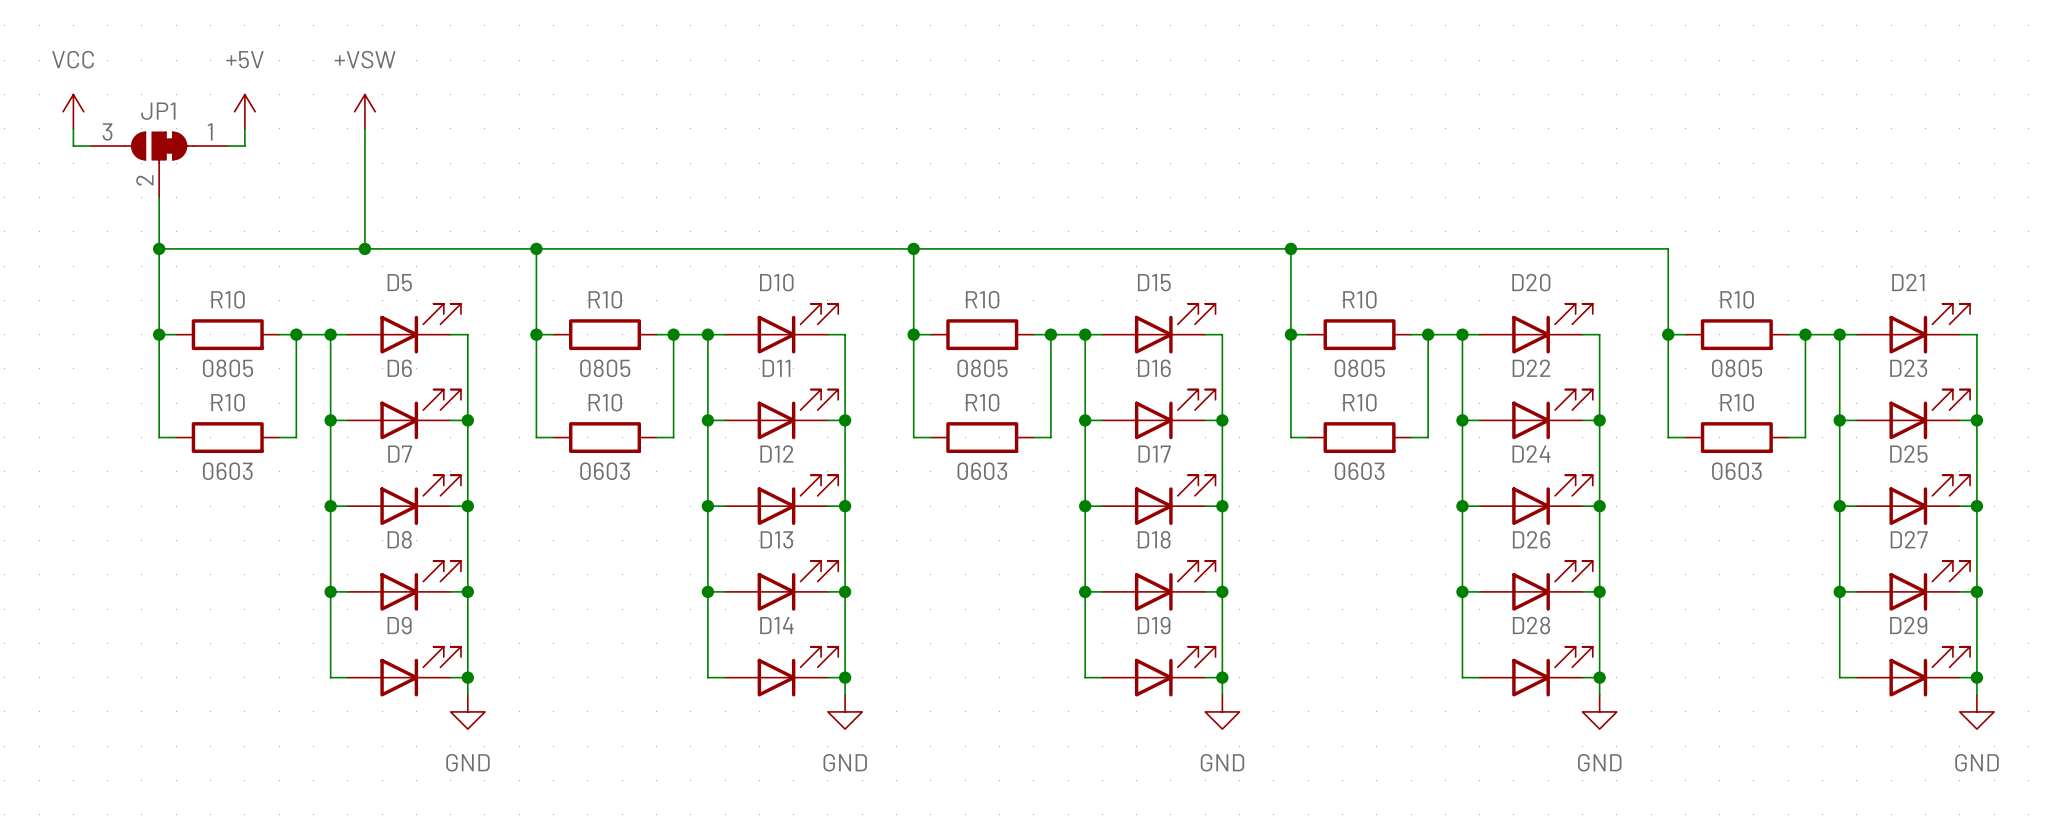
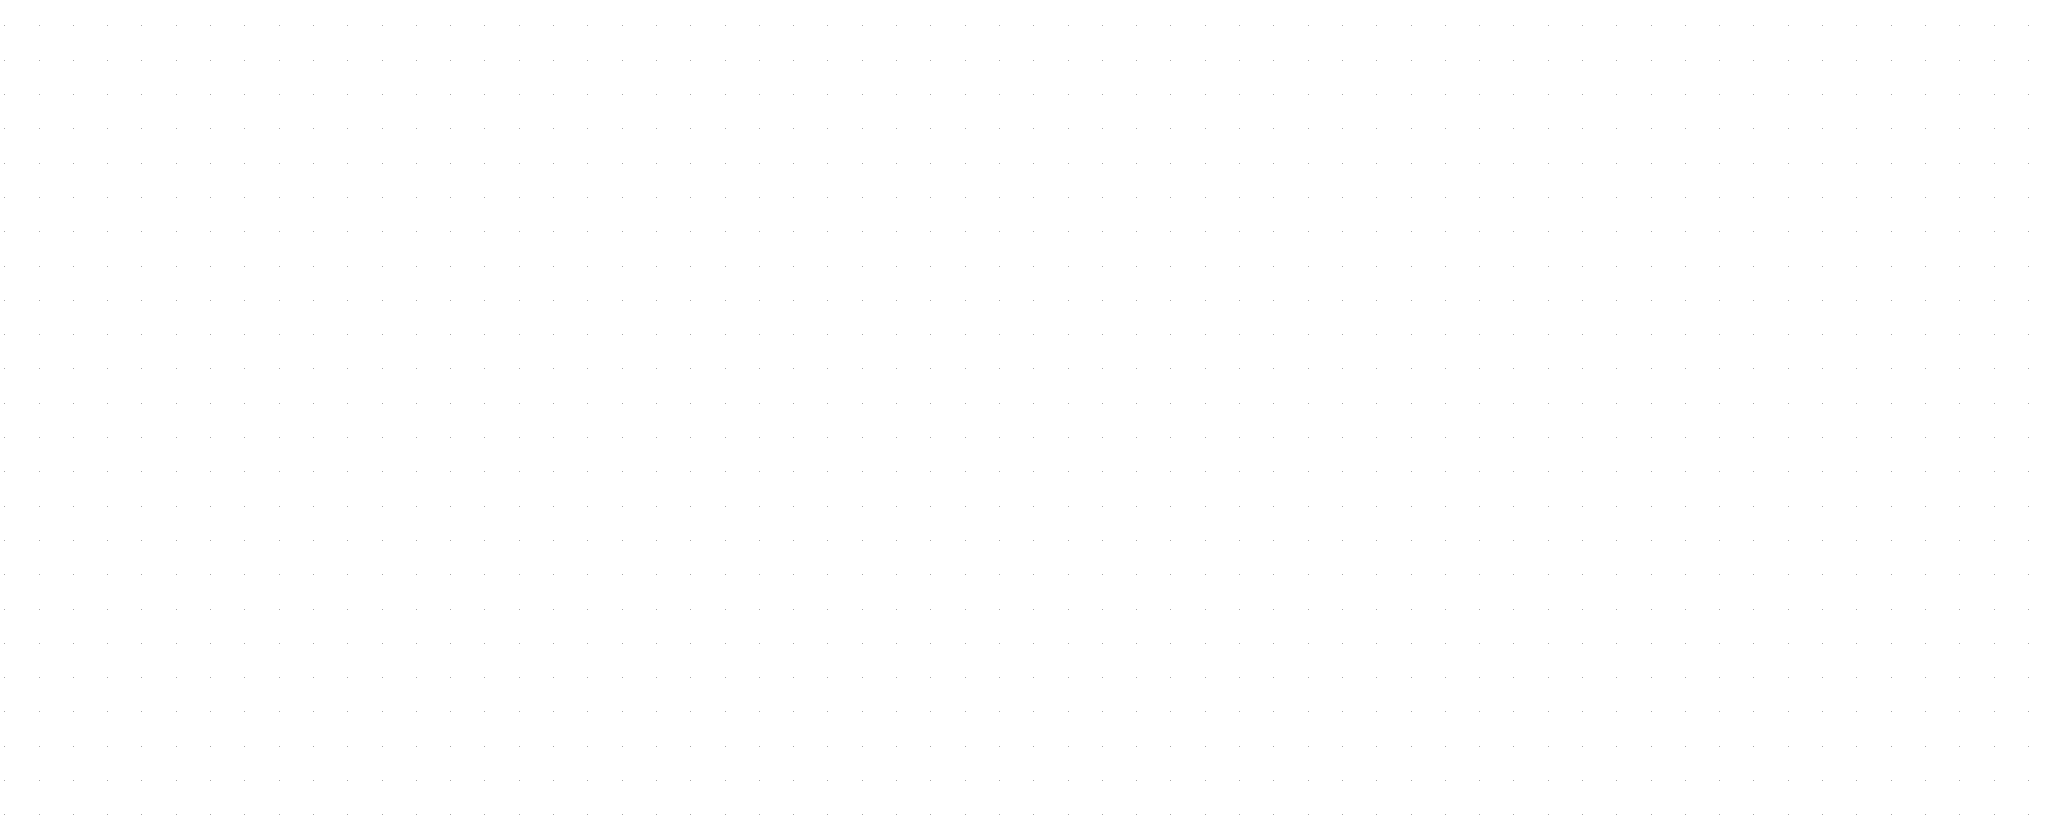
power symbol: VCC (73, 111) -> none
power symbol: +5V (244, 111) -> none
power symbol: +VSW (364, 111) -> none
wire: (73, 128) (73, 146) (90, 146) -> none
wire: (244, 128) (244, 146) (227, 146) -> none
wire: (364, 128) (364, 248) -> none
JP1: (159, 164) -> none
wire: (159, 197) (159, 437) (176, 437) -> none
wire: (159, 248) (1668, 248) (1668, 437) (1685, 437) -> none
junction: (159, 248) -> none
junction: (364, 248) -> none
wire: (536, 248) (536, 437) (553, 437) -> none
junction: (536, 248) -> none
wire: (913, 248) (913, 437) (930, 437) -> none
junction: (913, 248) -> none
wire: (1290, 248) (1290, 437) (1308, 437) -> none
junction: (1290, 248) -> none
D5: (404, 328) -> none
D10: (781, 328) -> none
D15: (1158, 328) -> none
D20: (1536, 328) -> none
D21: (1913, 328) -> none
wire: (159, 334) (176, 334) -> none
junction: (159, 334) -> none
R10: 0805 (227, 334) -> none
wire: (279, 334) (347, 334) -> none
wire: (296, 334) (296, 437) (279, 437) -> none
junction: (296, 334) -> none
wire: (330, 334) (330, 677) (347, 677) -> none
junction: (330, 334) -> none
wire: (450, 334) (467, 334) (467, 694) -> none
wire: (536, 334) (553, 334) -> none
junction: (536, 334) -> none
R10: 0805 (605, 334) -> none
wire: (656, 334) (725, 334) -> none
wire: (673, 334) (673, 437) (656, 437) -> none
junction: (673, 334) -> none
wire: (707, 334) (707, 677) (725, 677) -> none
junction: (707, 334) -> none
wire: (827, 334) (845, 334) (845, 694) -> none
wire: (913, 334) (930, 334) -> none
junction: (913, 334) -> none
R10: 0805 (982, 334) -> none
wire: (1033, 334) (1102, 334) -> none
wire: (1050, 334) (1050, 437) (1033, 437) -> none
junction: (1050, 334) -> none
wire: (1085, 334) (1085, 677) (1102, 677) -> none
junction: (1085, 334) -> none
wire: (1205, 334) (1222, 334) (1222, 694) -> none
wire: (1290, 334) (1308, 334) -> none
junction: (1290, 334) -> none
R10: 0805 (1359, 334) -> none
wire: (1411, 334) (1479, 334) -> none
wire: (1428, 334) (1428, 437) (1411, 437) -> none
junction: (1428, 334) -> none
wire: (1462, 334) (1462, 677) (1479, 677) -> none
junction: (1462, 334) -> none
wire: (1582, 334) (1599, 334) (1599, 694) -> none
wire: (1668, 334) (1685, 334) -> none
junction: (1668, 334) -> none
R10: 0805 (1736, 334) -> none
wire: (1788, 334) (1856, 334) -> none
wire: (1805, 334) (1805, 437) (1788, 437) -> none
junction: (1805, 334) -> none
wire: (1839, 334) (1839, 677) (1856, 677) -> none
junction: (1839, 334) -> none
wire: (1959, 334) (1976, 334) (1976, 694) -> none
D6: (404, 414) -> none
D11: (781, 414) -> none
D16: (1158, 414) -> none
D22: (1536, 414) -> none
D23: (1913, 414) -> none
wire: (330, 420) (347, 420) -> none
junction: (330, 420) -> none
wire: (450, 420) (467, 420) -> none
junction: (467, 420) -> none
wire: (707, 420) (725, 420) -> none
junction: (707, 420) -> none
wire: (827, 420) (845, 420) -> none
junction: (845, 420) -> none
wire: (1085, 420) (1102, 420) -> none
junction: (1085, 420) -> none
wire: (1205, 420) (1222, 420) -> none
junction: (1222, 420) -> none
wire: (1462, 420) (1479, 420) -> none
junction: (1462, 420) -> none
wire: (1582, 420) (1599, 420) -> none
junction: (1599, 420) -> none
wire: (1839, 420) (1856, 420) -> none
junction: (1839, 420) -> none
wire: (1959, 420) (1976, 420) -> none
junction: (1976, 420) -> none
R10: 0603 (227, 437) -> none
R10: 0603 (605, 437) -> none
R10: 0603 (982, 437) -> none
R10: 0603 (1359, 437) -> none
R10: 0603 (1736, 437) -> none
D7: (404, 500) -> none
D12: (781, 500) -> none
D17: (1158, 500) -> none
D24: (1536, 500) -> none
D25: (1913, 500) -> none
wire: (330, 506) (347, 506) -> none
junction: (330, 506) -> none
wire: (450, 506) (467, 506) -> none
junction: (467, 506) -> none
wire: (707, 506) (725, 506) -> none
junction: (707, 506) -> none
wire: (827, 506) (845, 506) -> none
junction: (845, 506) -> none
wire: (1085, 506) (1102, 506) -> none
junction: (1085, 506) -> none
wire: (1205, 506) (1222, 506) -> none
junction: (1222, 506) -> none
wire: (1462, 506) (1479, 506) -> none
junction: (1462, 506) -> none
wire: (1582, 506) (1599, 506) -> none
junction: (1599, 506) -> none
wire: (1839, 506) (1856, 506) -> none
junction: (1839, 506) -> none
wire: (1959, 506) (1976, 506) -> none
junction: (1976, 506) -> none
D8: (404, 585) -> none
D13: (781, 585) -> none
D18: (1158, 585) -> none
D26: (1536, 585) -> none
D27: (1913, 585) -> none
wire: (330, 591) (347, 591) -> none
junction: (330, 591) -> none
wire: (450, 591) (467, 591) -> none
junction: (467, 591) -> none
wire: (707, 591) (725, 591) -> none
junction: (707, 591) -> none
wire: (827, 591) (845, 591) -> none
junction: (845, 591) -> none
wire: (1085, 591) (1102, 591) -> none
junction: (1085, 591) -> none
wire: (1205, 591) (1222, 591) -> none
junction: (1222, 591) -> none
wire: (1462, 591) (1479, 591) -> none
junction: (1462, 591) -> none
wire: (1582, 591) (1599, 591) -> none
junction: (1599, 591) -> none
wire: (1839, 591) (1856, 591) -> none
junction: (1839, 591) -> none
wire: (1959, 591) (1976, 591) -> none
junction: (1976, 591) -> none
D9: (404, 671) -> none
D14: (781, 671) -> none
D19: (1158, 671) -> none
D28: (1536, 671) -> none
D29: (1913, 671) -> none
wire: (450, 677) (467, 677) -> none
junction: (467, 677) -> none
wire: (827, 677) (845, 677) -> none
junction: (845, 677) -> none
wire: (1205, 677) (1222, 677) -> none
junction: (1222, 677) -> none
wire: (1582, 677) (1599, 677) -> none
junction: (1599, 677) -> none
wire: (1959, 677) (1976, 677) -> none
junction: (1976, 677) -> none
power symbol: GND (467, 711) -> none
power symbol: GND (845, 711) -> none
power symbol: GND (1222, 711) -> none
power symbol: GND (1599, 711) -> none
power symbol: GND (1976, 711) -> none

